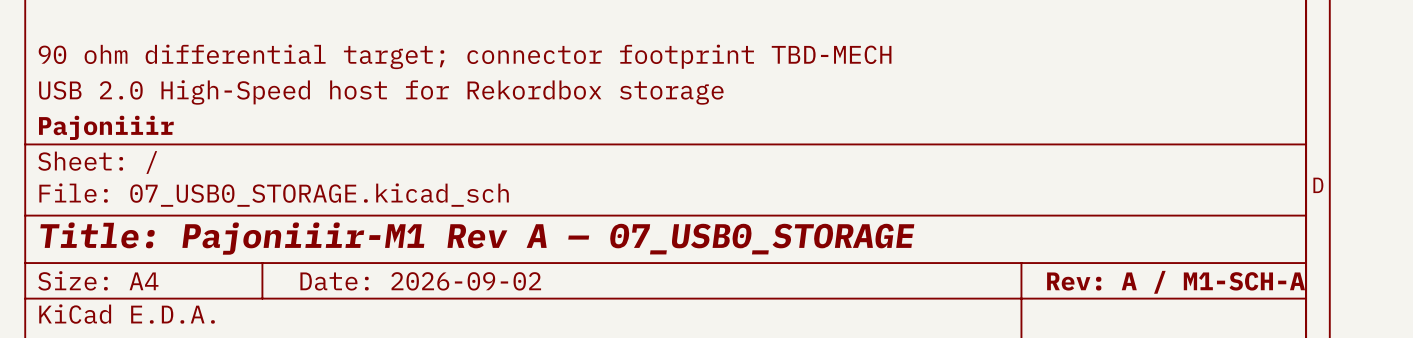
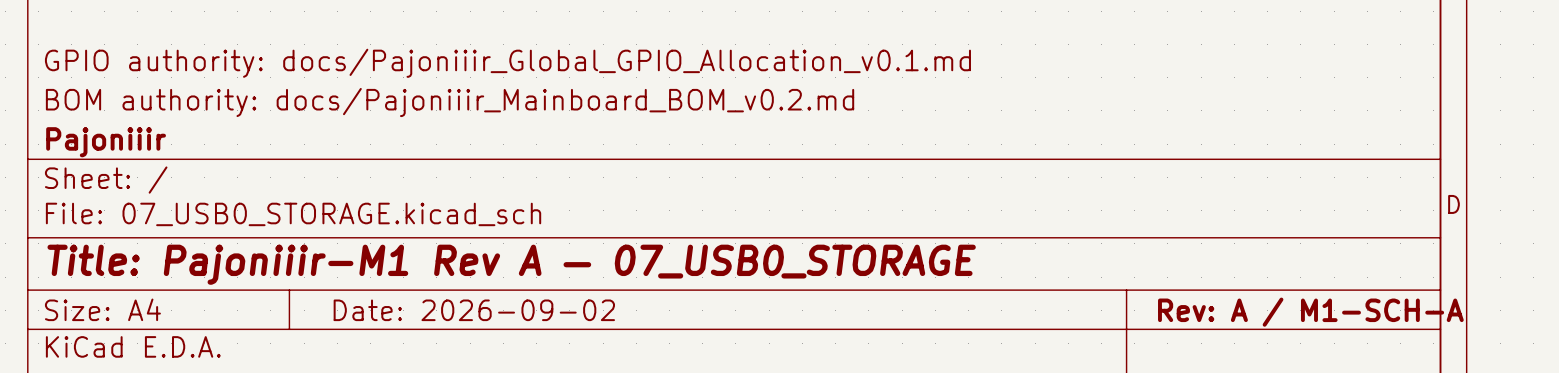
title block: 90 ohm differential target; connector footprint TBD-MECH (465, 56) -> GPIO authority: docs/Pajoniiir_Global_GPIO_Allocation_v0.1.md (507, 63)
title block: USB 2.0 High-Speed host for Rekordbox storage (381, 92) -> BOM authority: docs/Pajoniiir_Mainboard_BOM_v0.2.md (450, 102)

